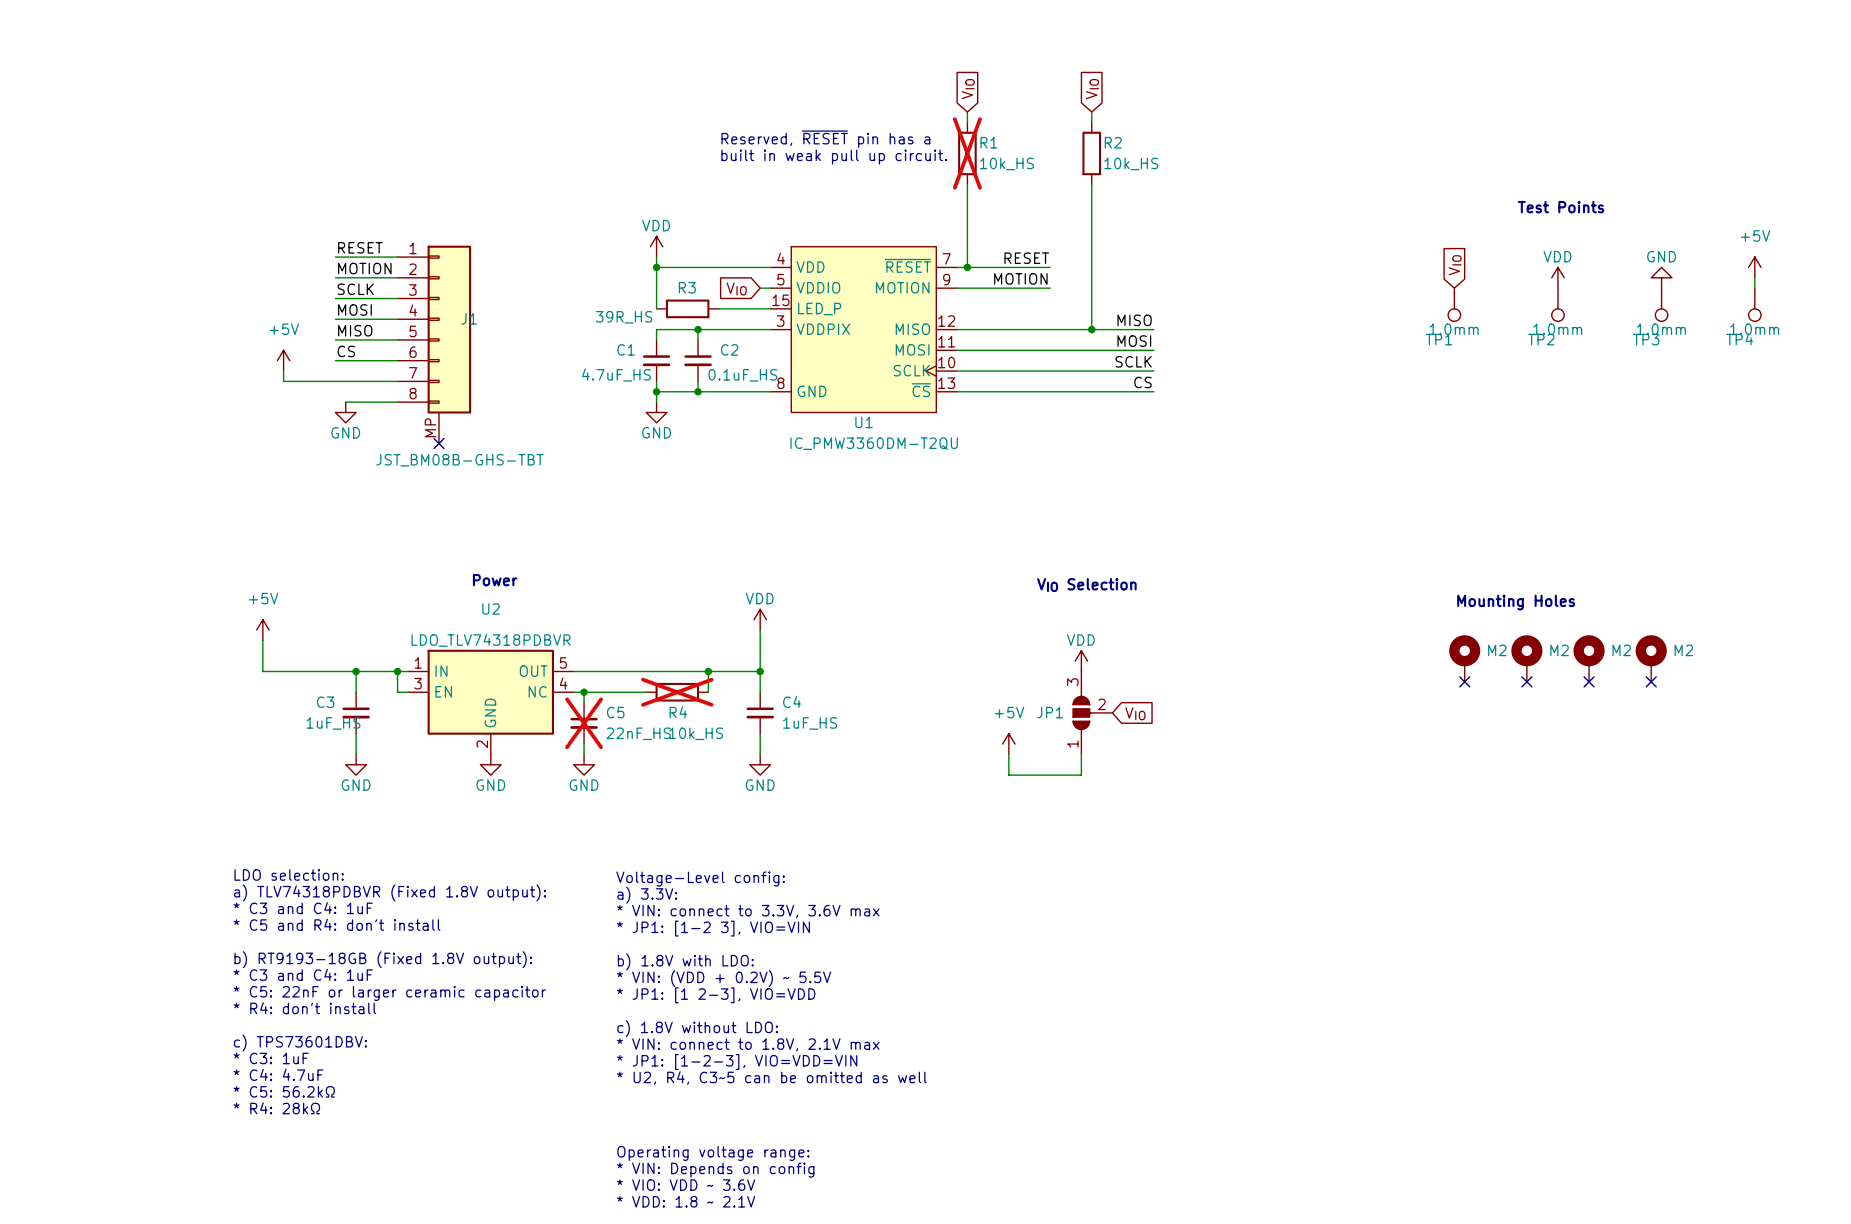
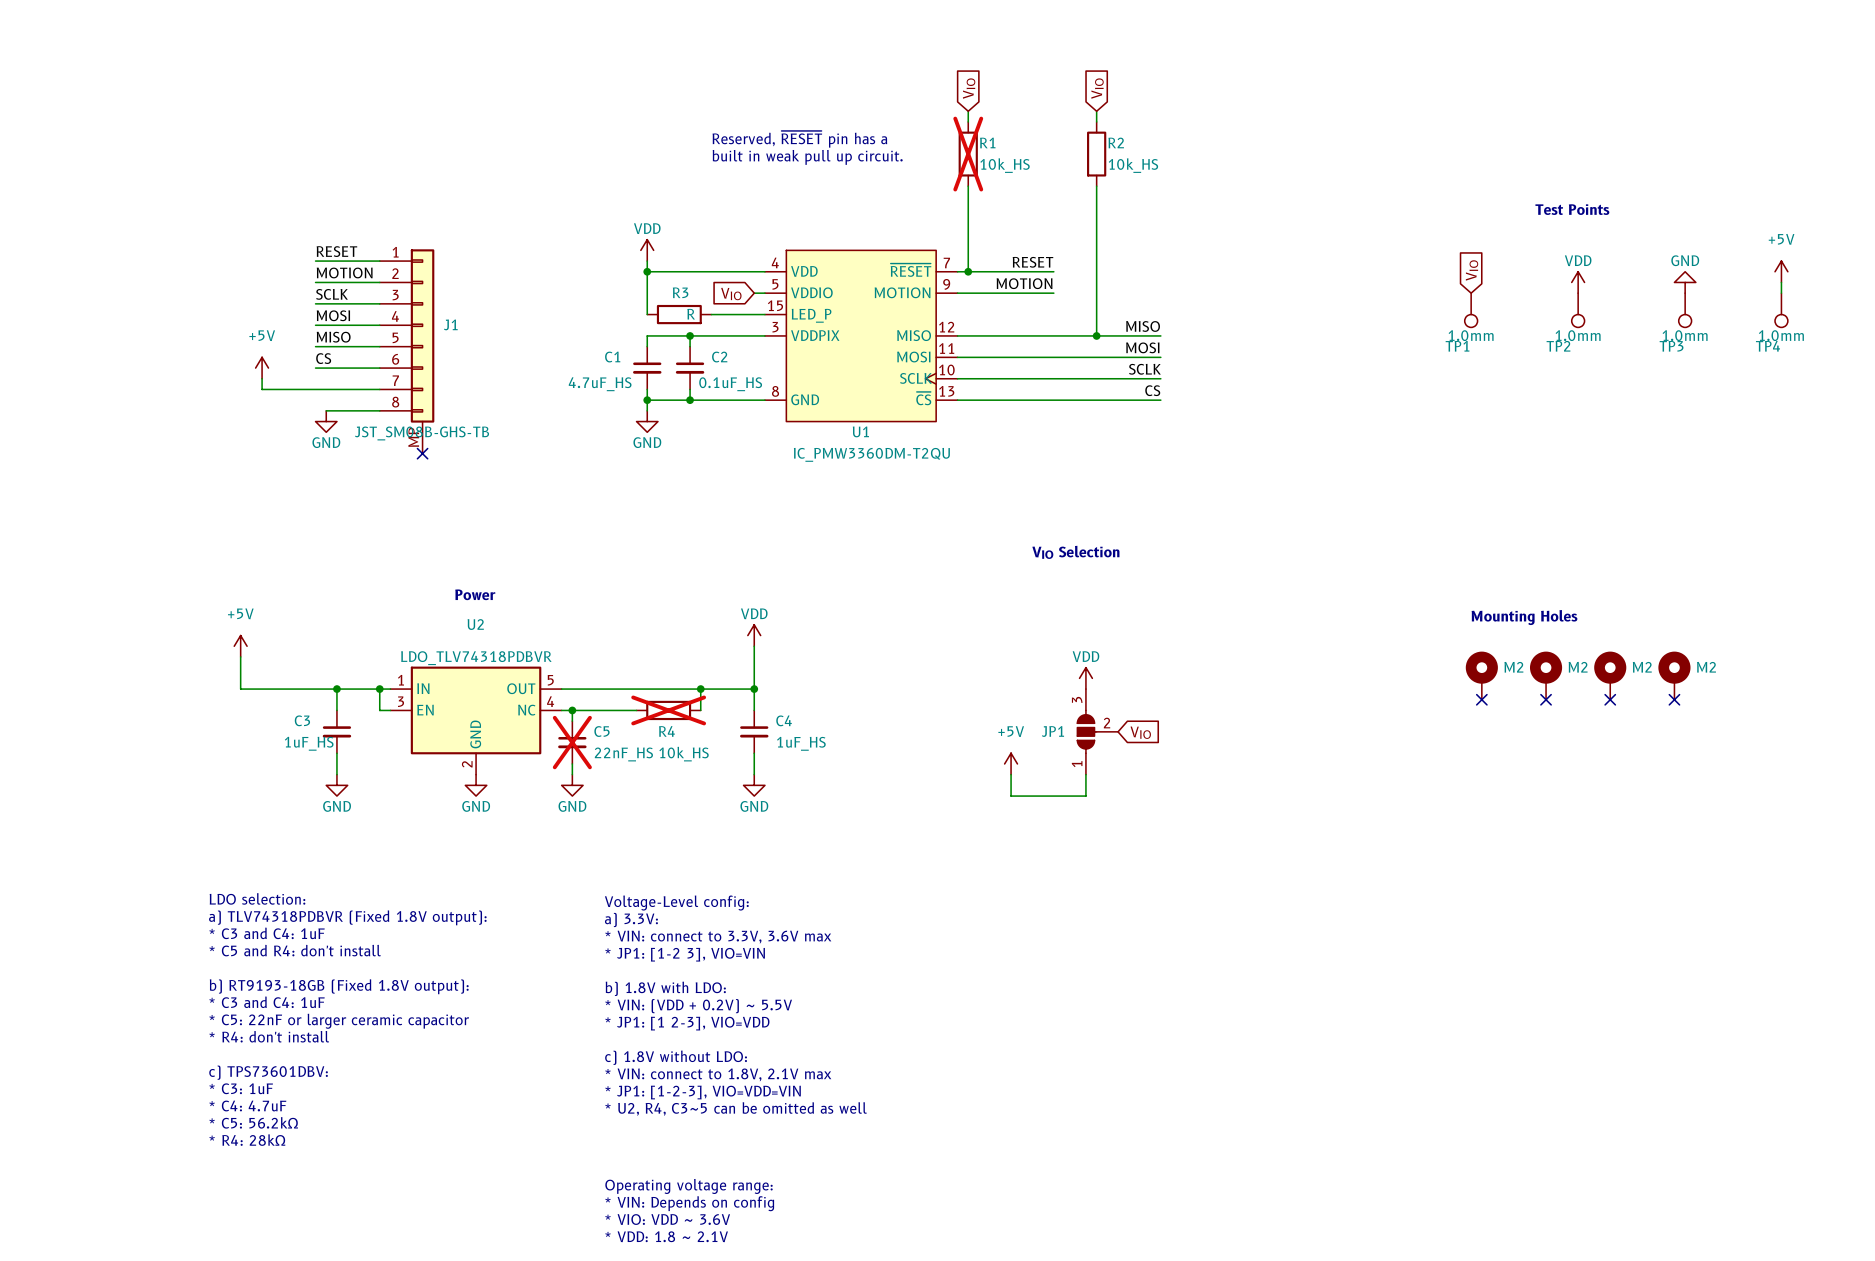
J1 symbol: [397, 245, 472, 444] -> [379, 249, 435, 454]
R3 value: 39R_HS (624, 317) -> R (691, 314)
J1 value: JST_BM08B-GHS-TBT (459, 460) -> JST_SM08B-GHS-TB (422, 433)
text position: VIO Selection (1086, 585) -> VIO Selection (1075, 552)

